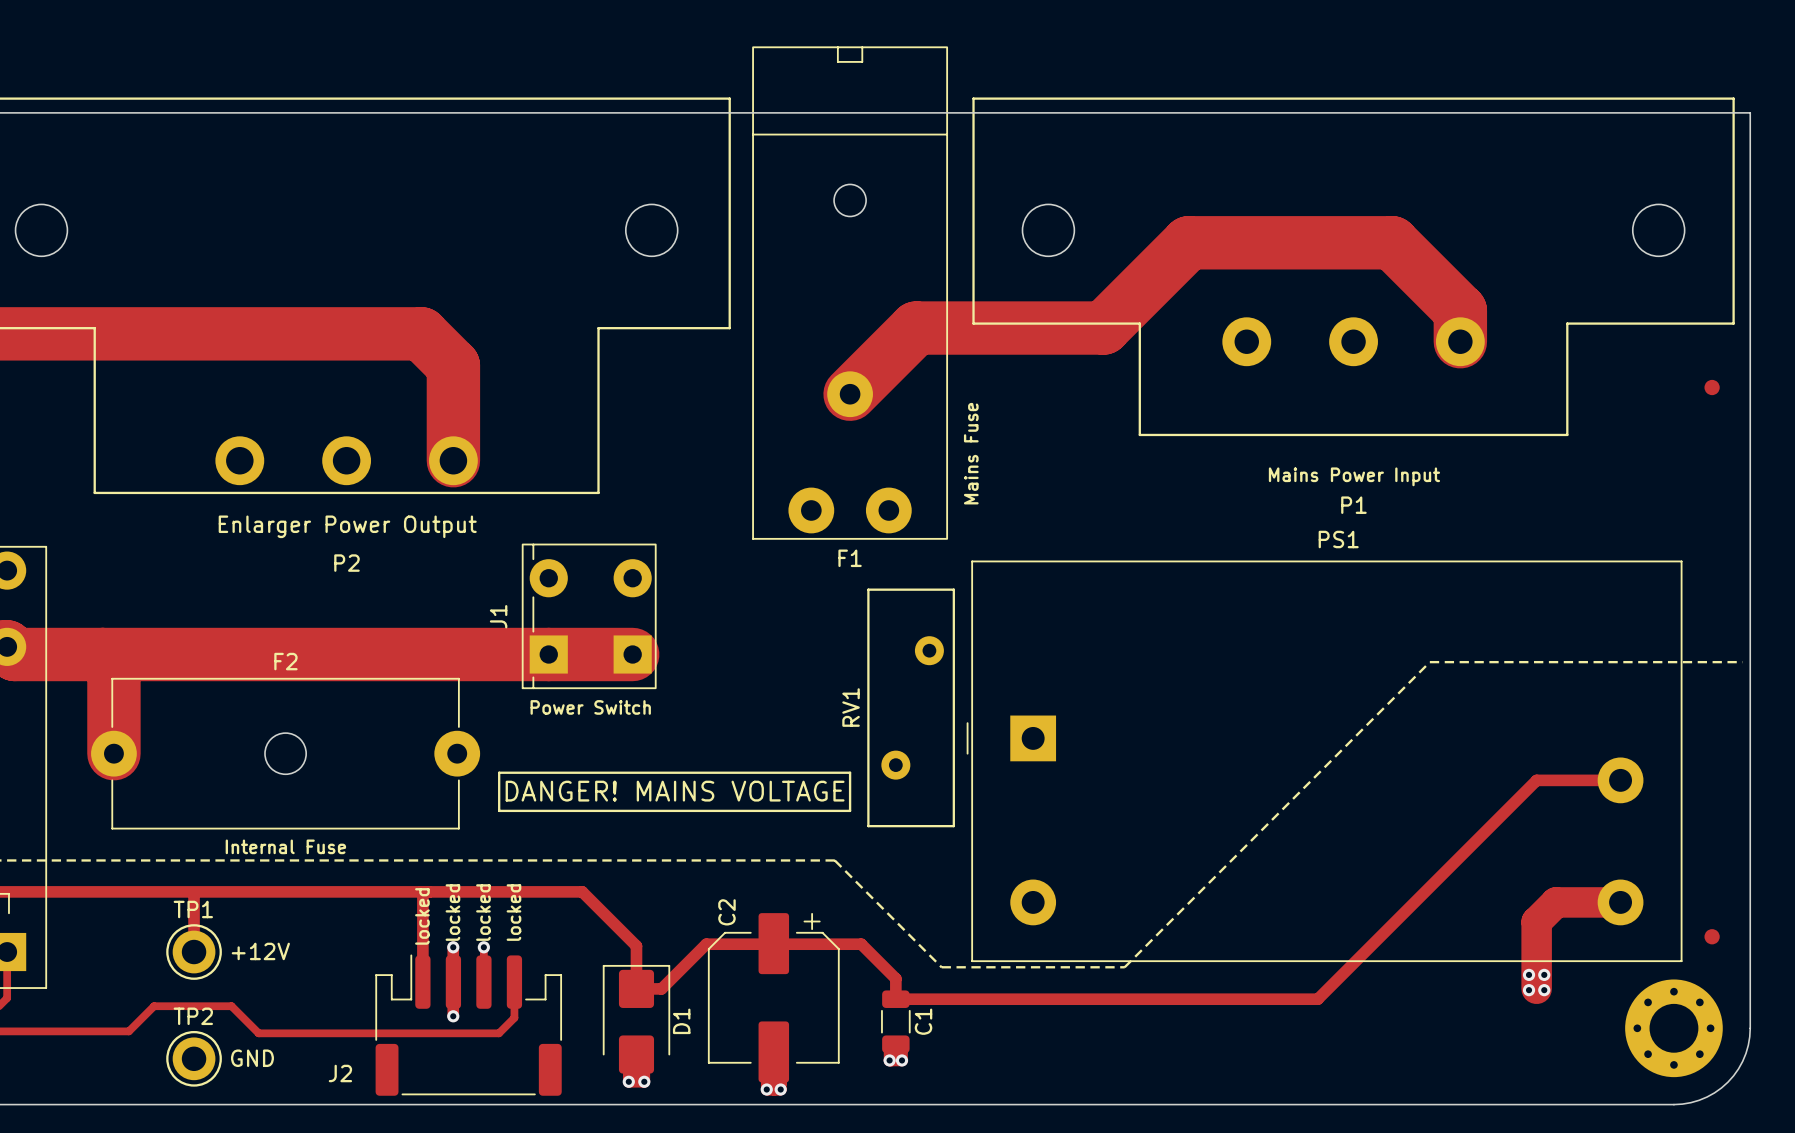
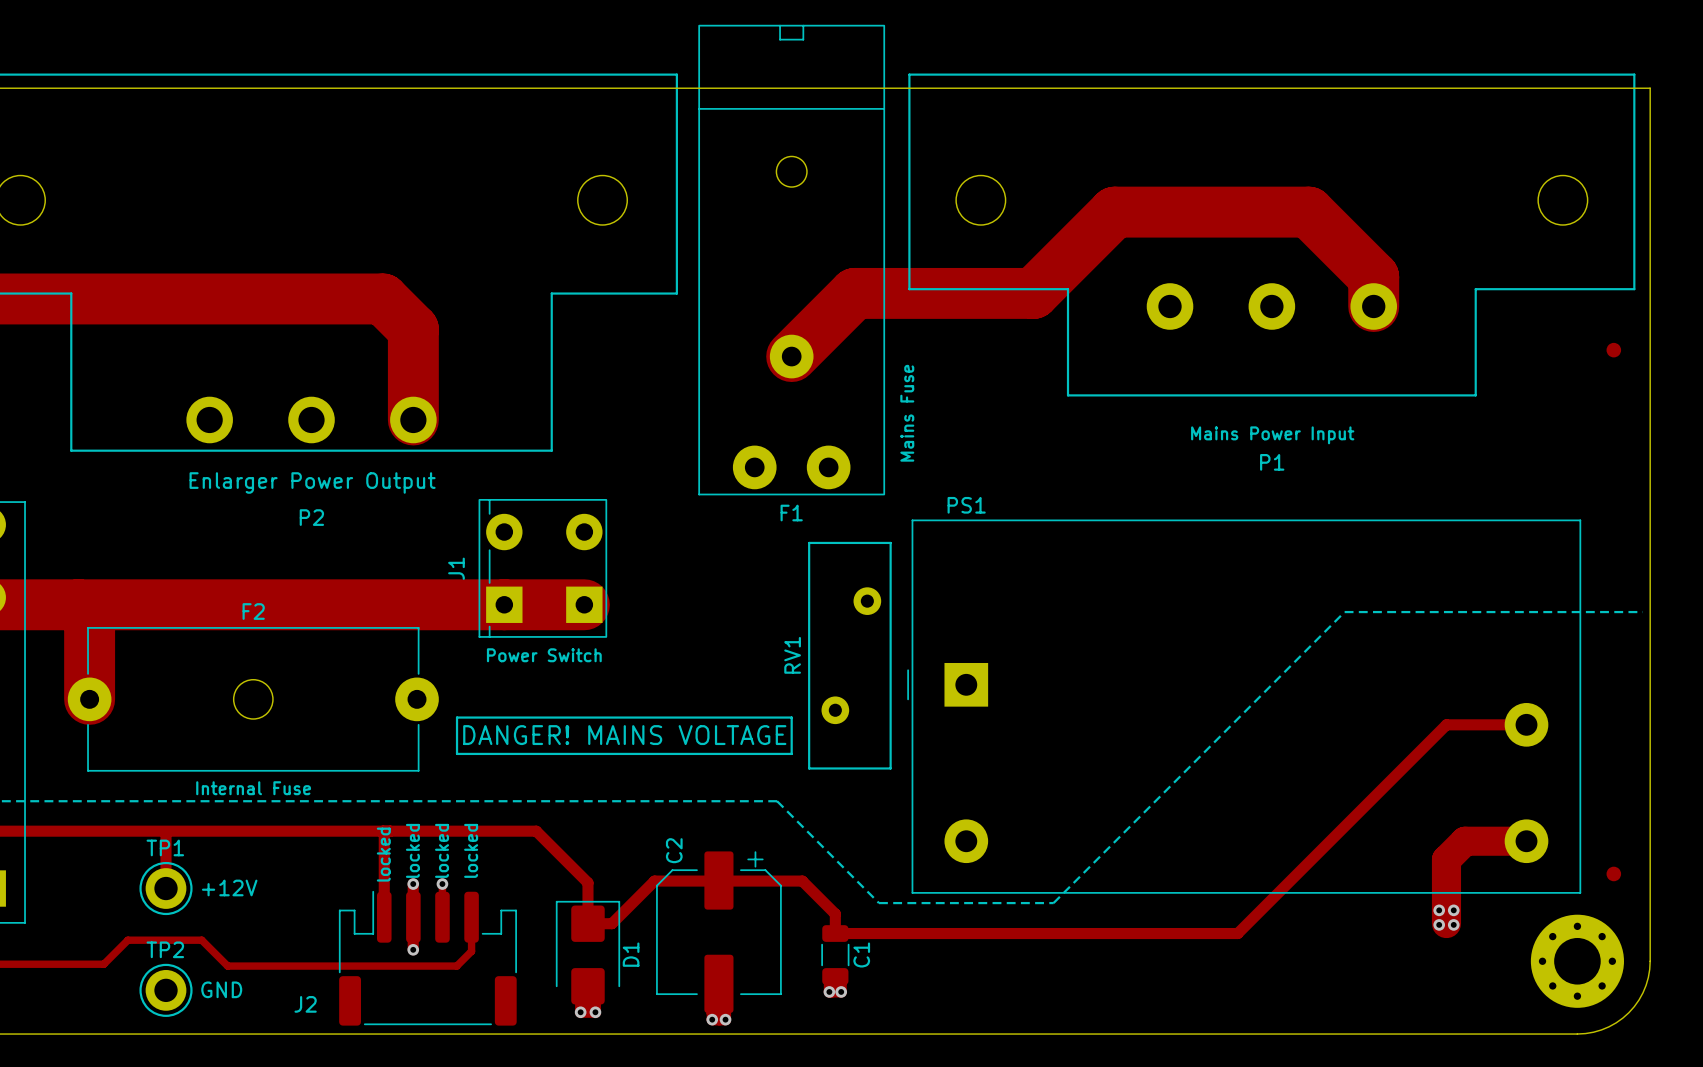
PS1 name position: PS1 (1338, 539) -> PS1 (966, 505)
PS1 footprint: [966, 560, 1683, 963] -> [907, 519, 1582, 894]

